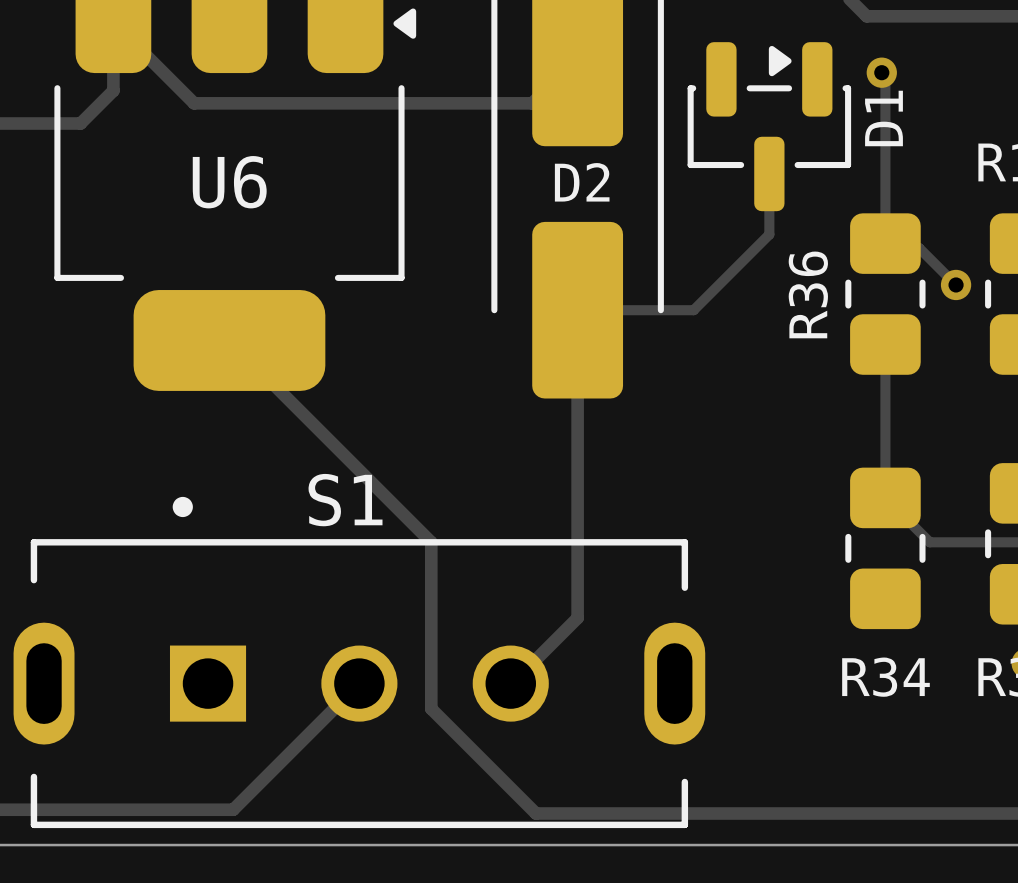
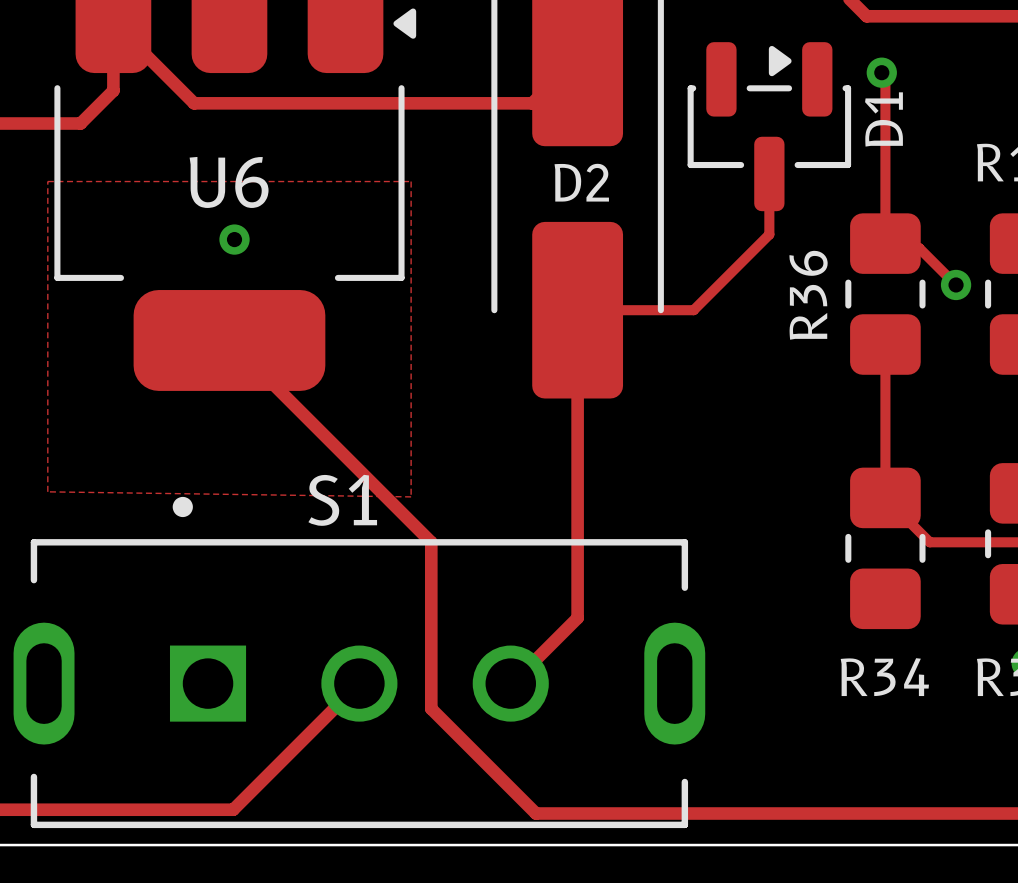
zone outline: none -> (47, 181) (411, 181) (411, 496) (47, 491) (47, 181)
via: none -> (234, 239)

